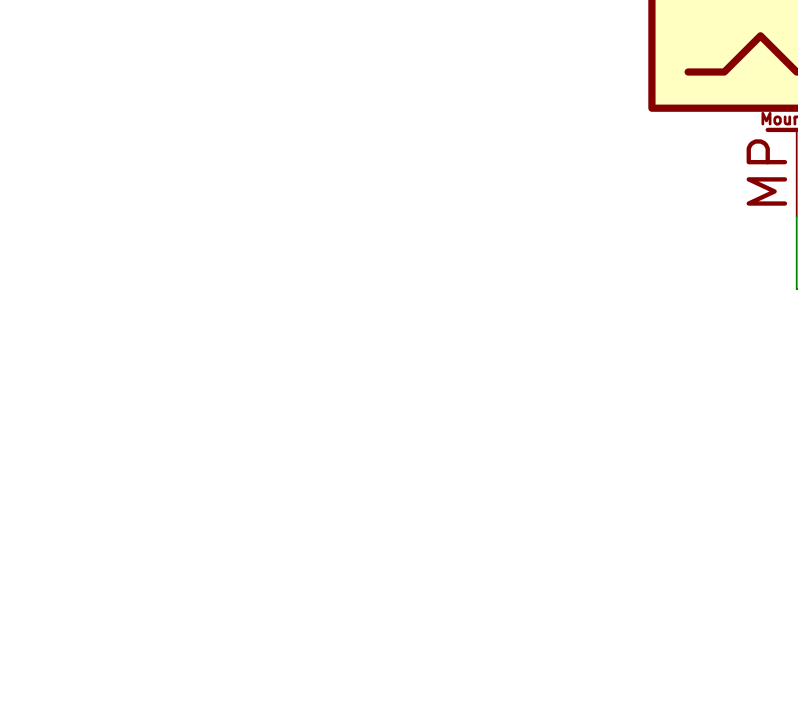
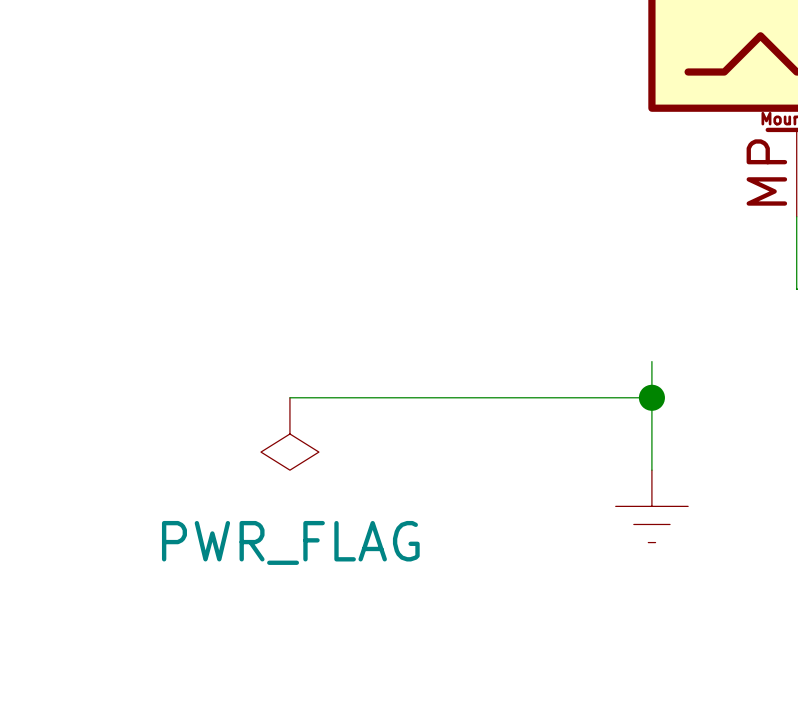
wire: none -> (651, 361) (651, 470)
wire: none -> (289, 397) (651, 397)
junction: none -> (651, 397)
power symbol: none -> PWR_FLAG (289, 433)
power symbol: none -> (651, 506)

